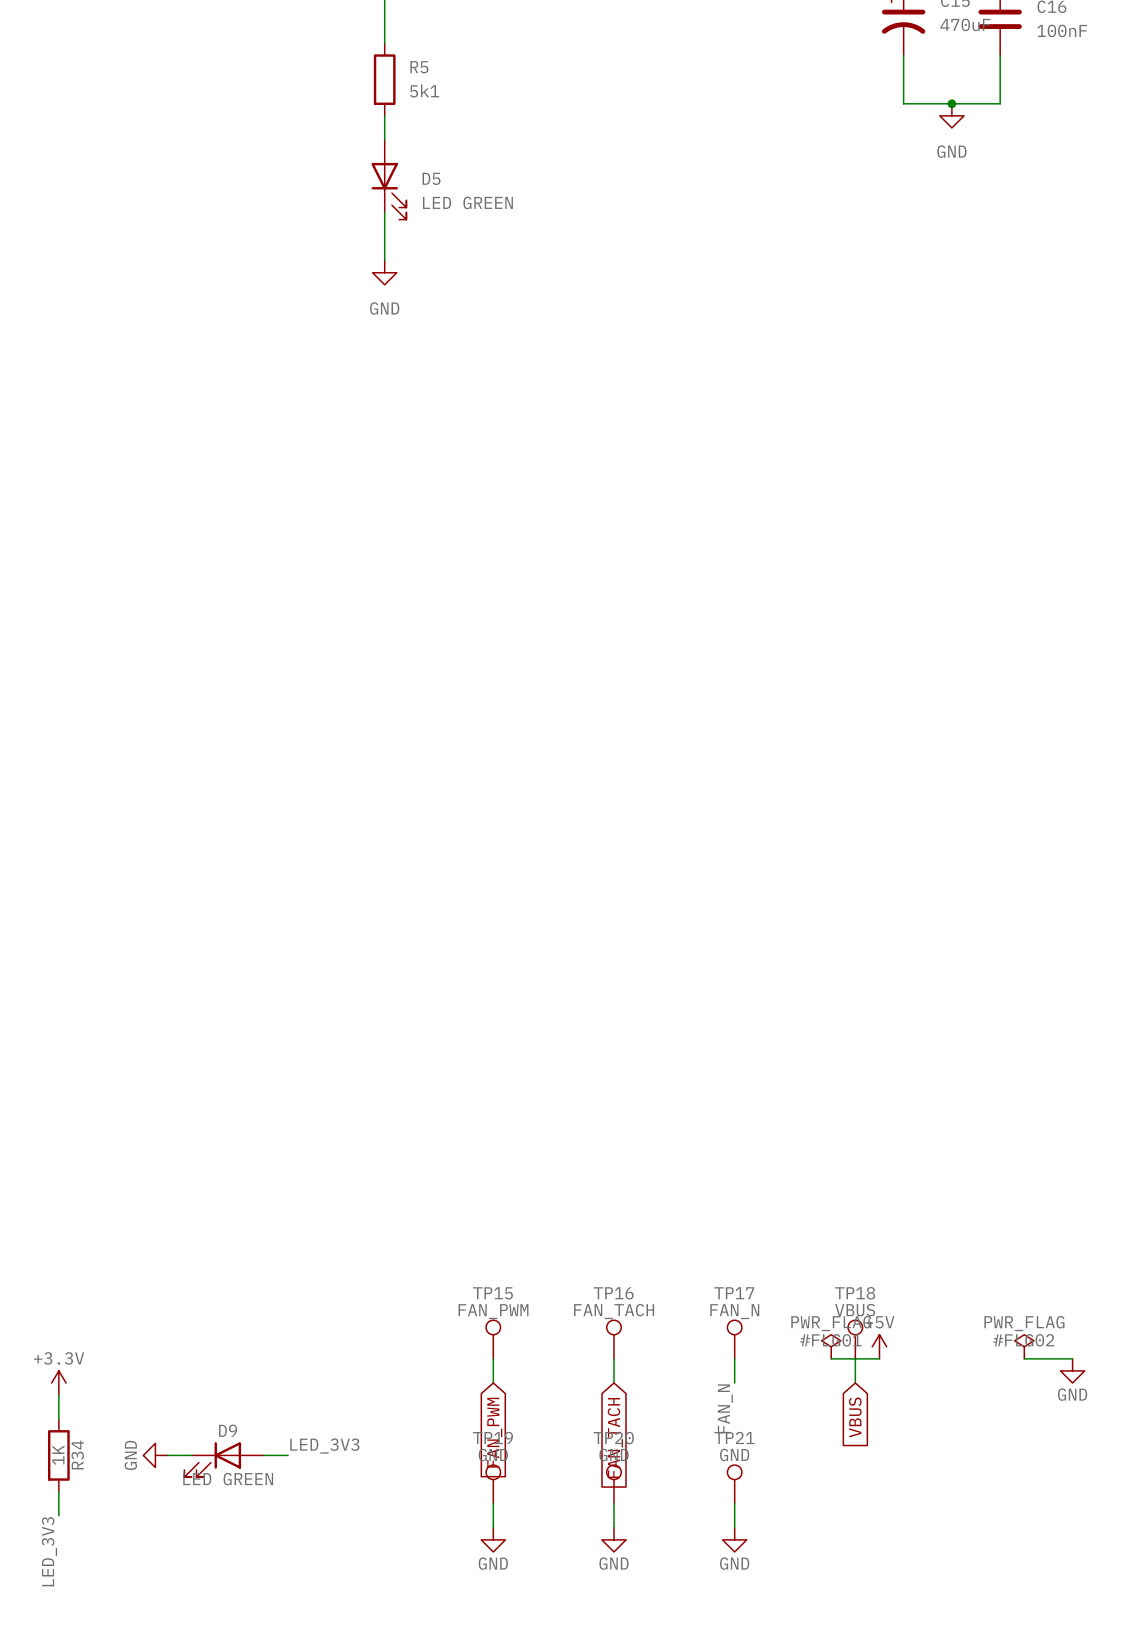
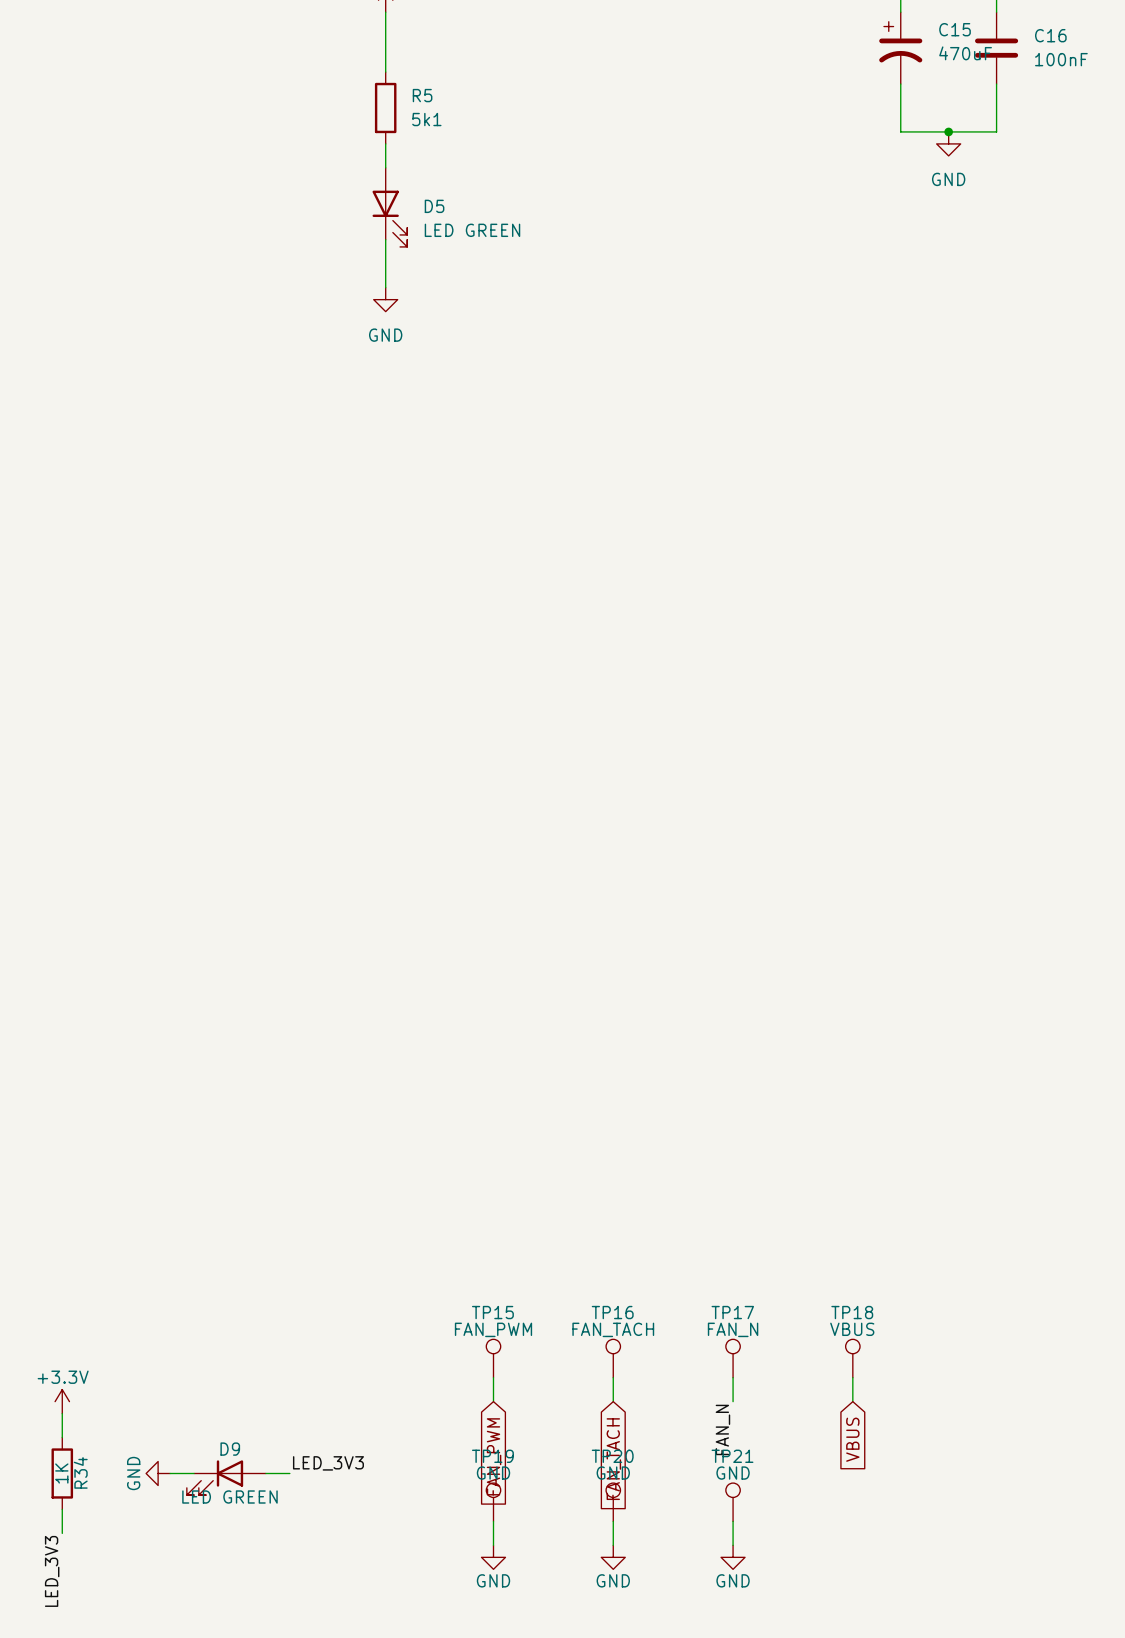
#FLG01: PWR_FLAG (831, 1346) -> none
power symbol: +5V (879, 1346) -> none
#FLG02: PWR_FLAG (1024, 1346) -> none
wire: (831, 1358) (879, 1358) -> none
wire: (1024, 1358) (1072, 1358) -> none
power symbol: GND (1072, 1370) -> none

